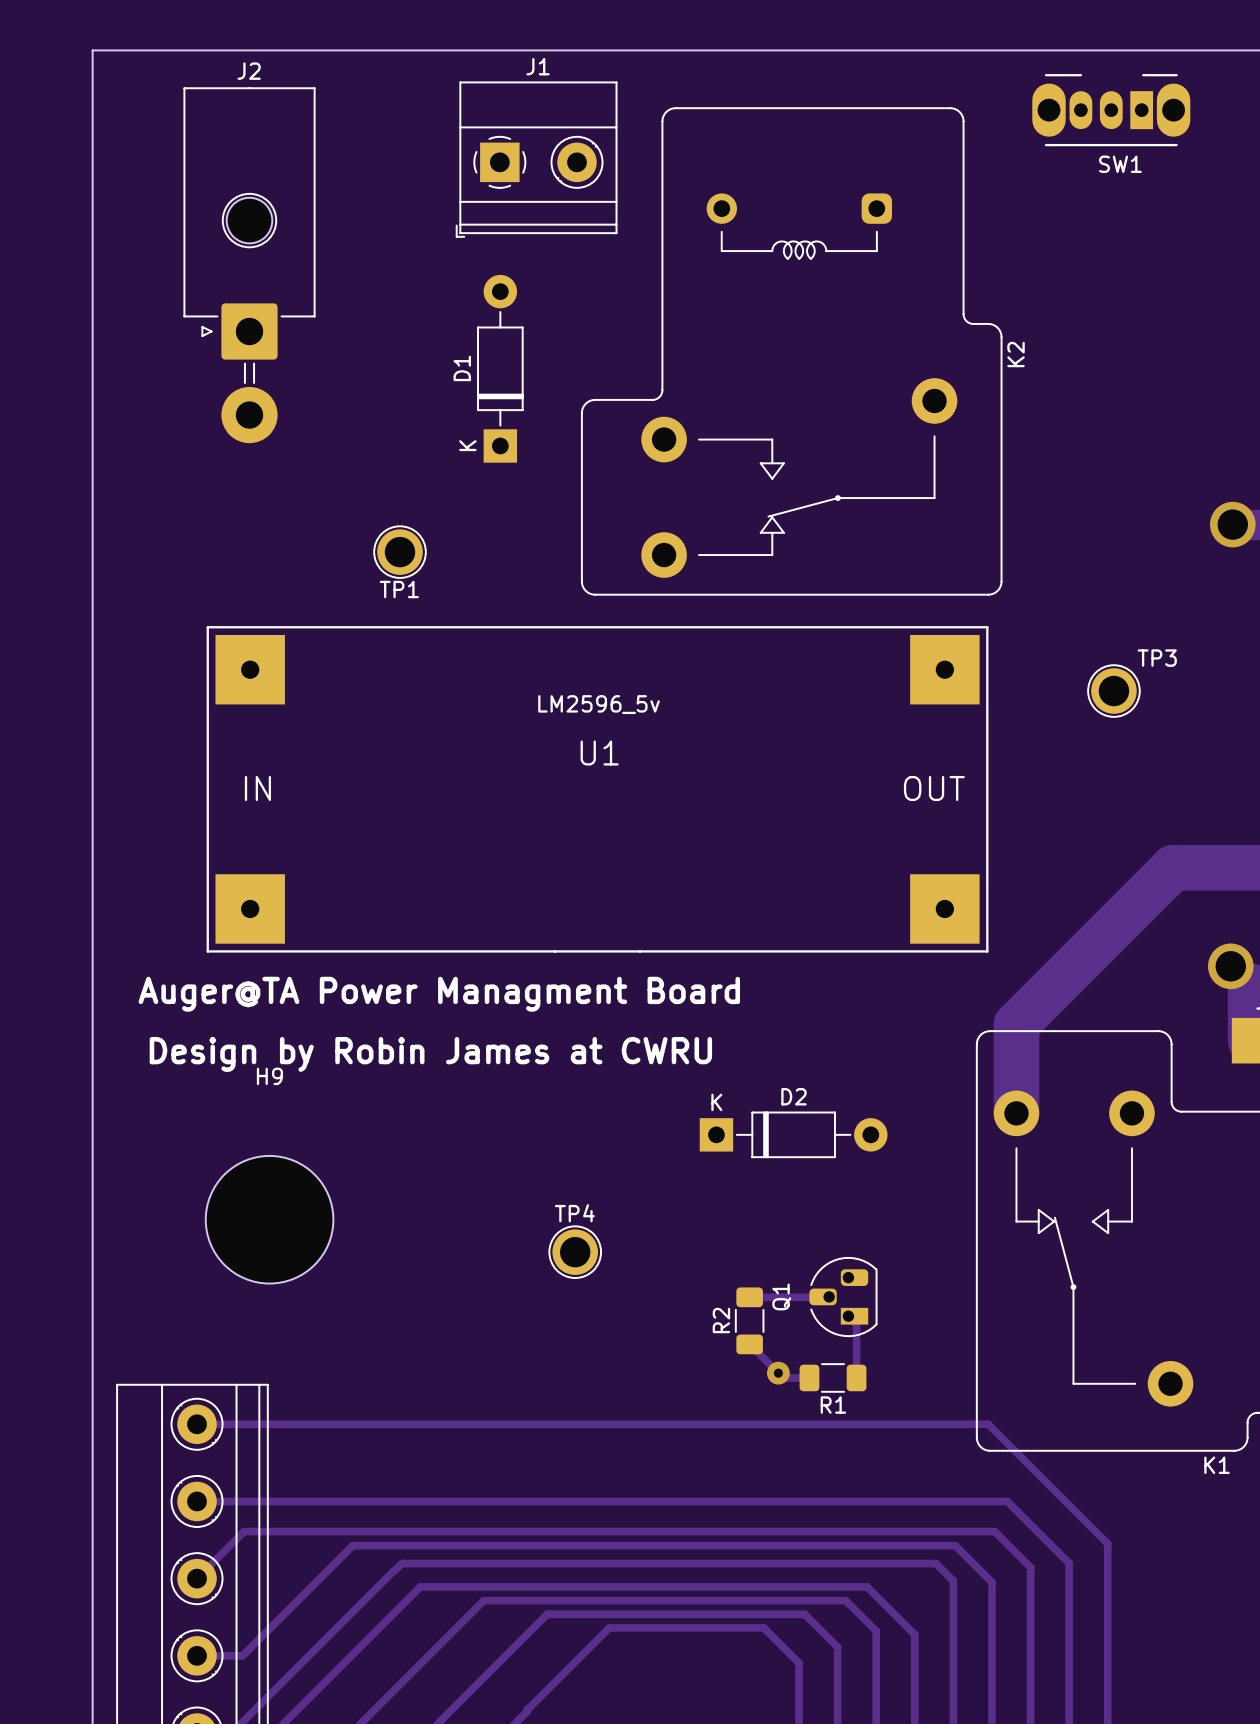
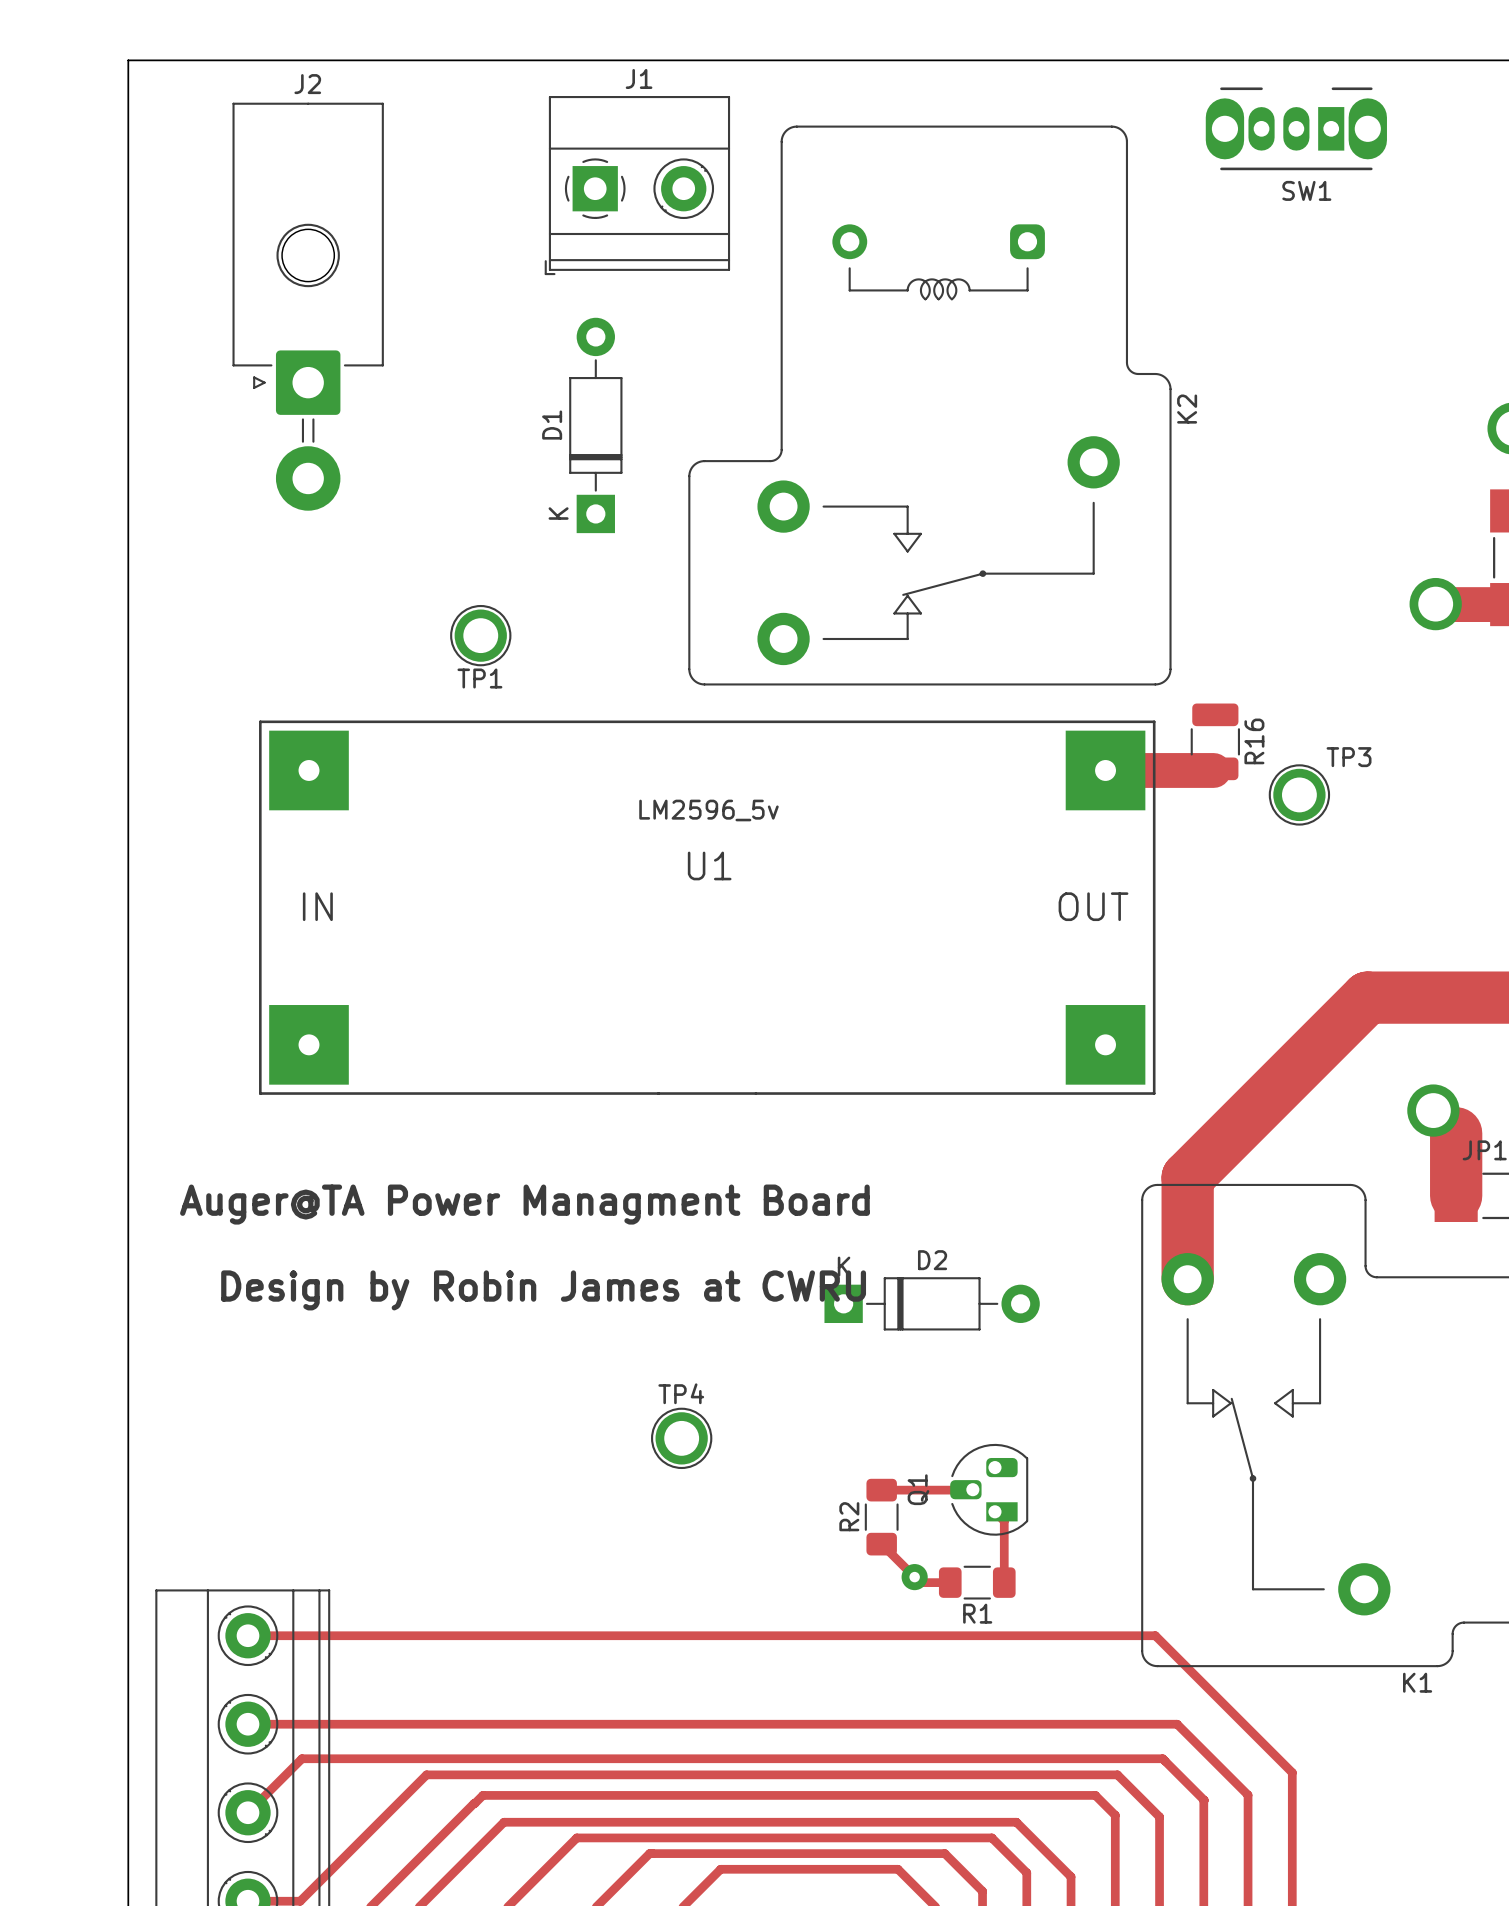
R16: none -> (1215, 741)
track: none -> (1215, 768) (1213, 770) (1105, 770)
text: Auger@TA Power Managment Board (439, 994) -> none
text: Design by Robin James at CWRU (430, 1054) -> Auger@TA Power Managment Board (524, 1204)
text: none -> Design by Robin James at CWRU (543, 1290)
H9: (269, 1219) -> none

